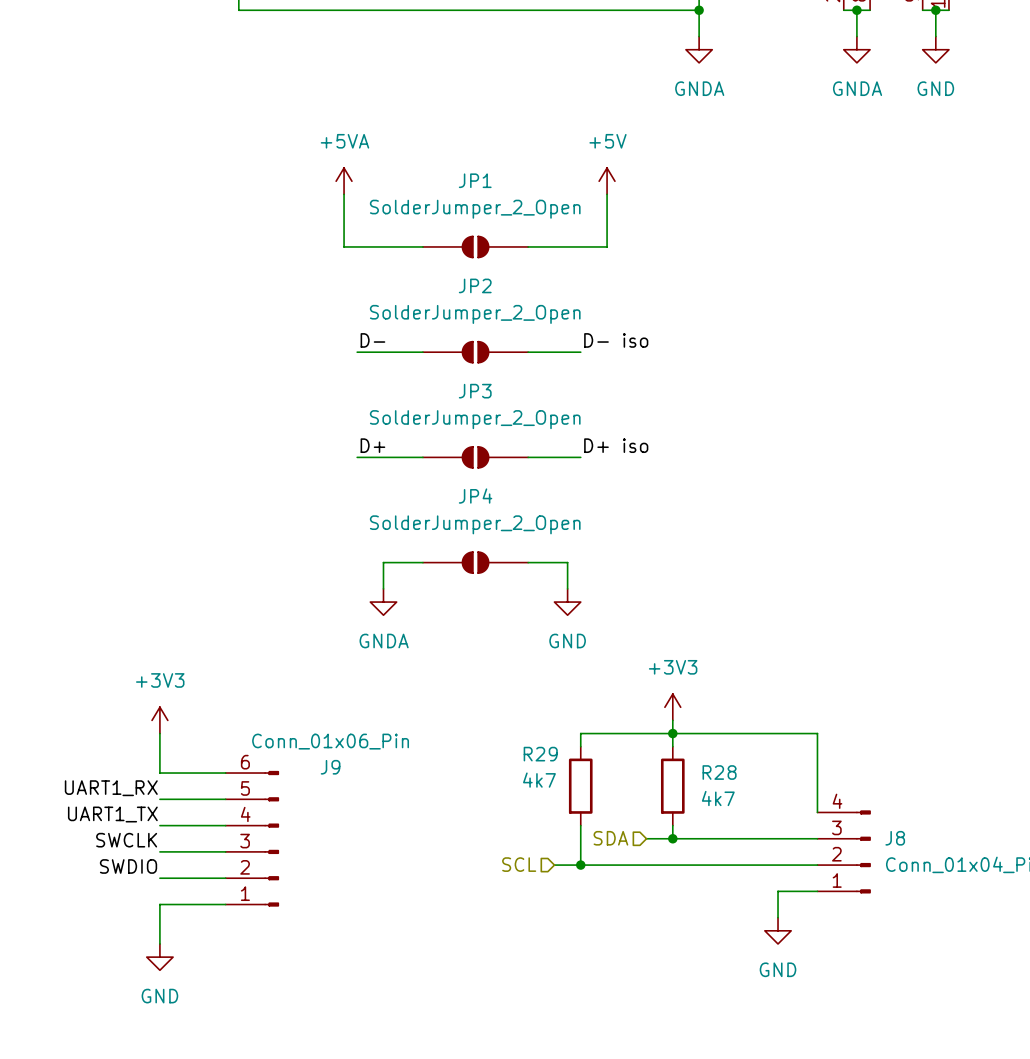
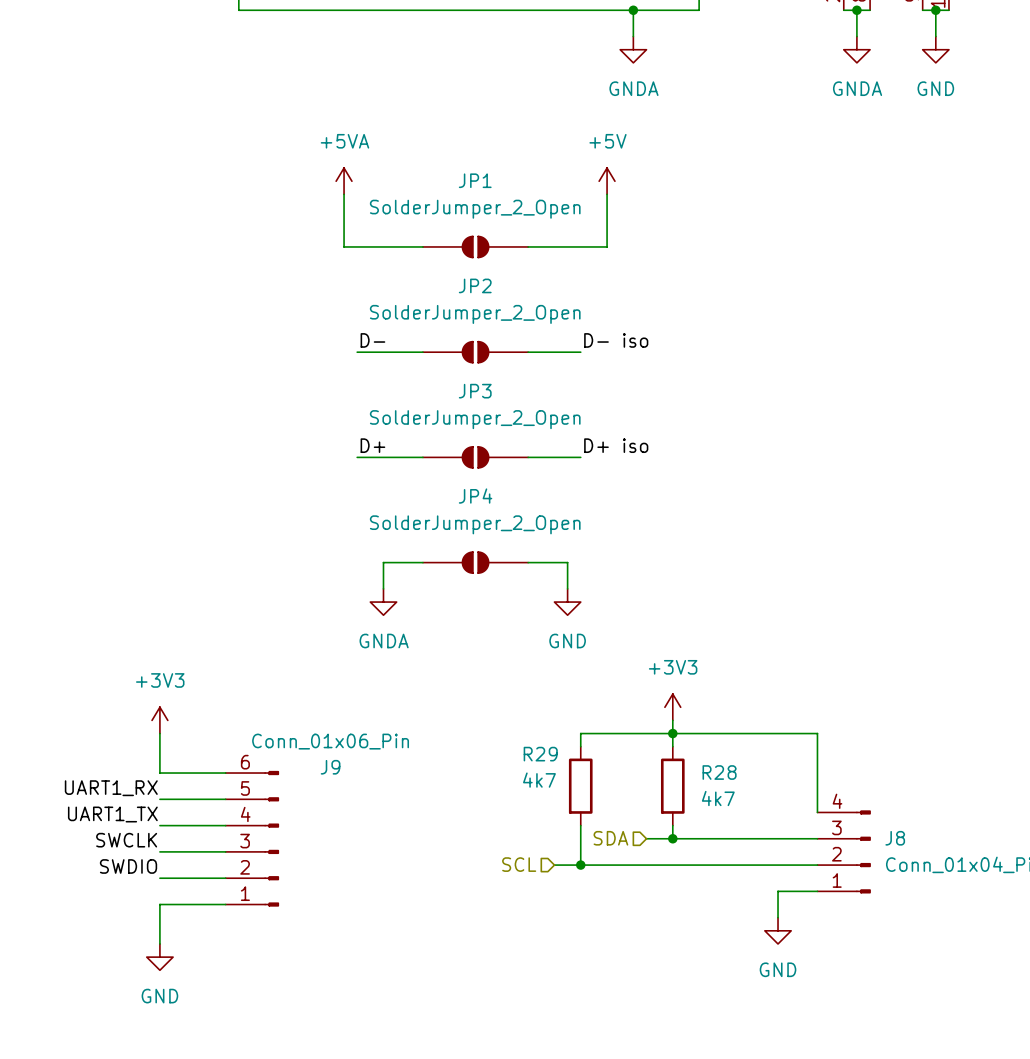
junction: none -> (633, 10)
wire: (699, 10) (699, 36) -> (633, 10) (633, 36)
junction: (699, 10) -> none
power symbol position: GNDA (699, 49) -> GNDA (633, 49)

